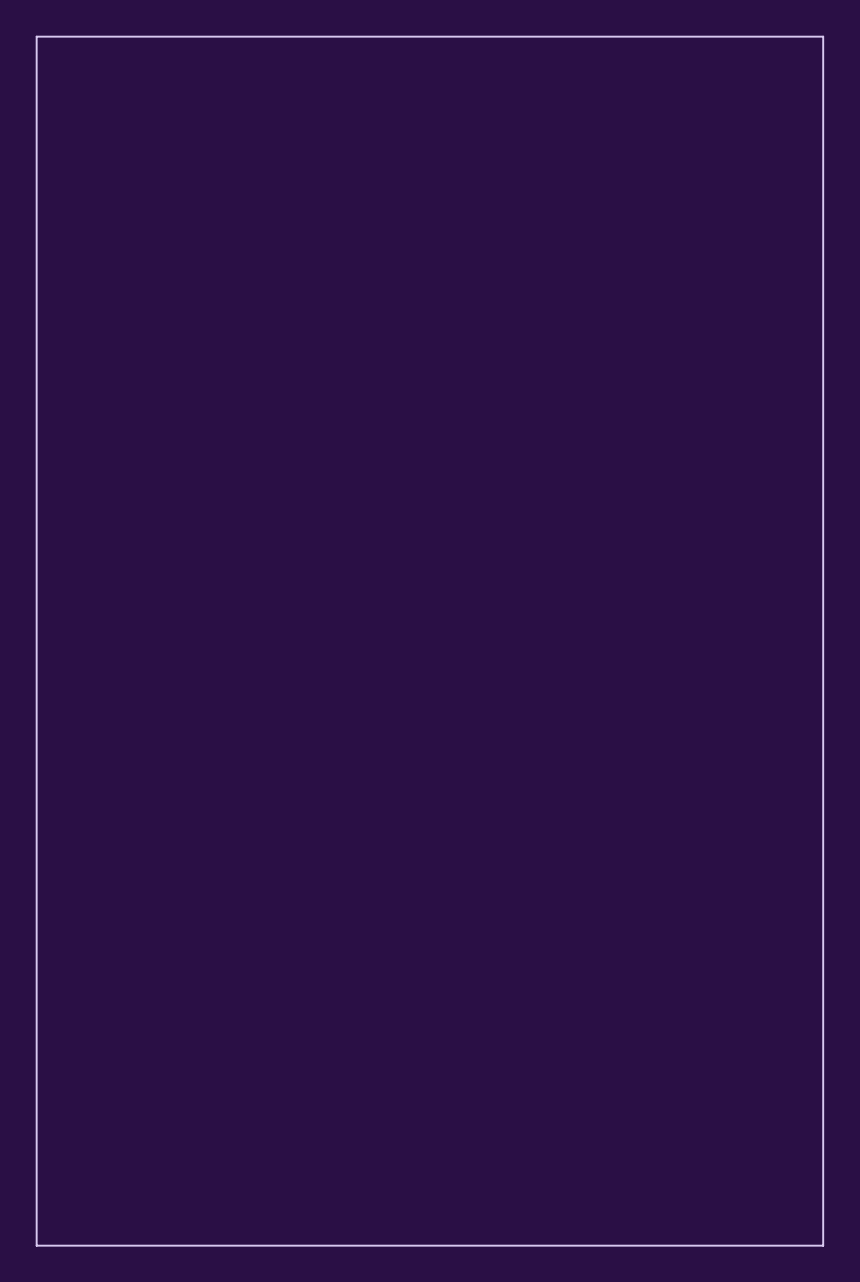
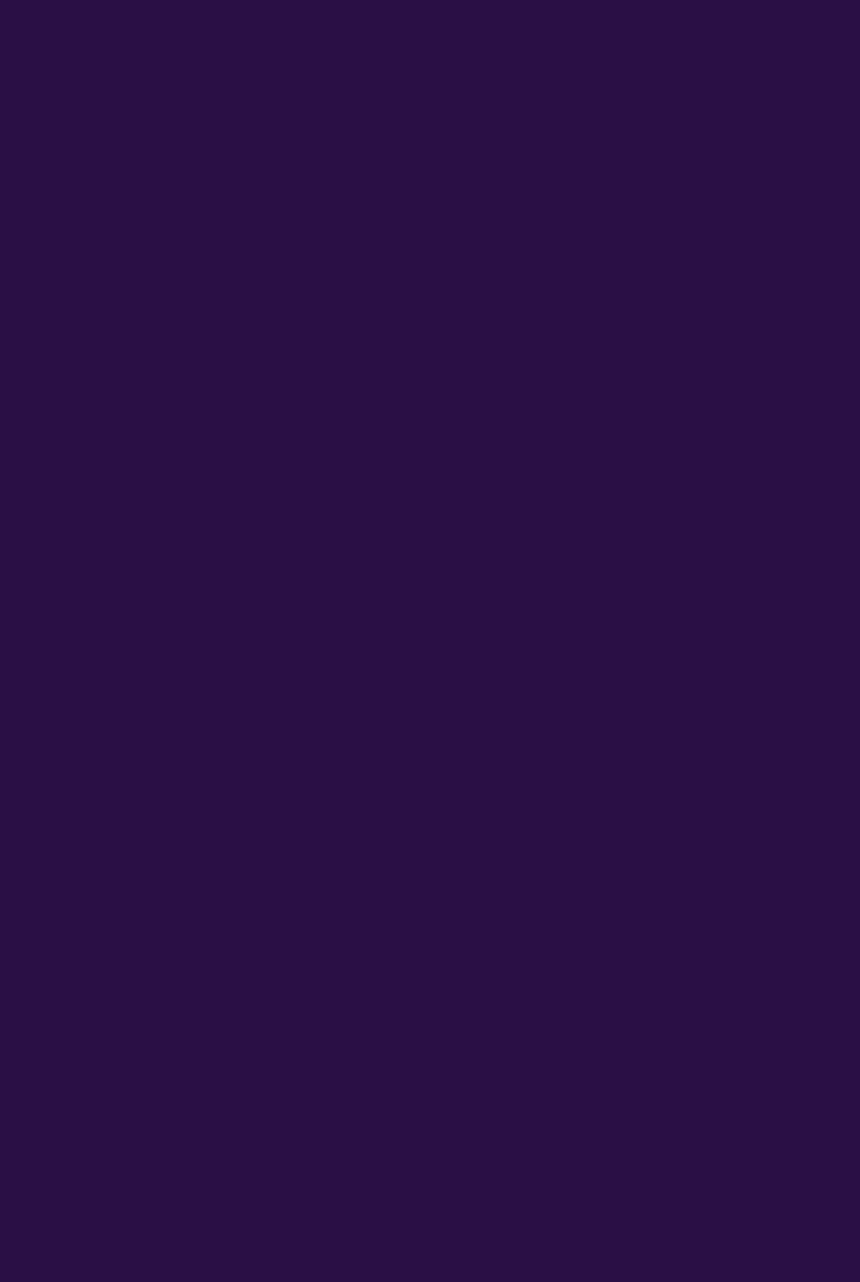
board edge: (36, 36) (823, 36) (823, 1245) (36, 1245) (36, 36) -> none

